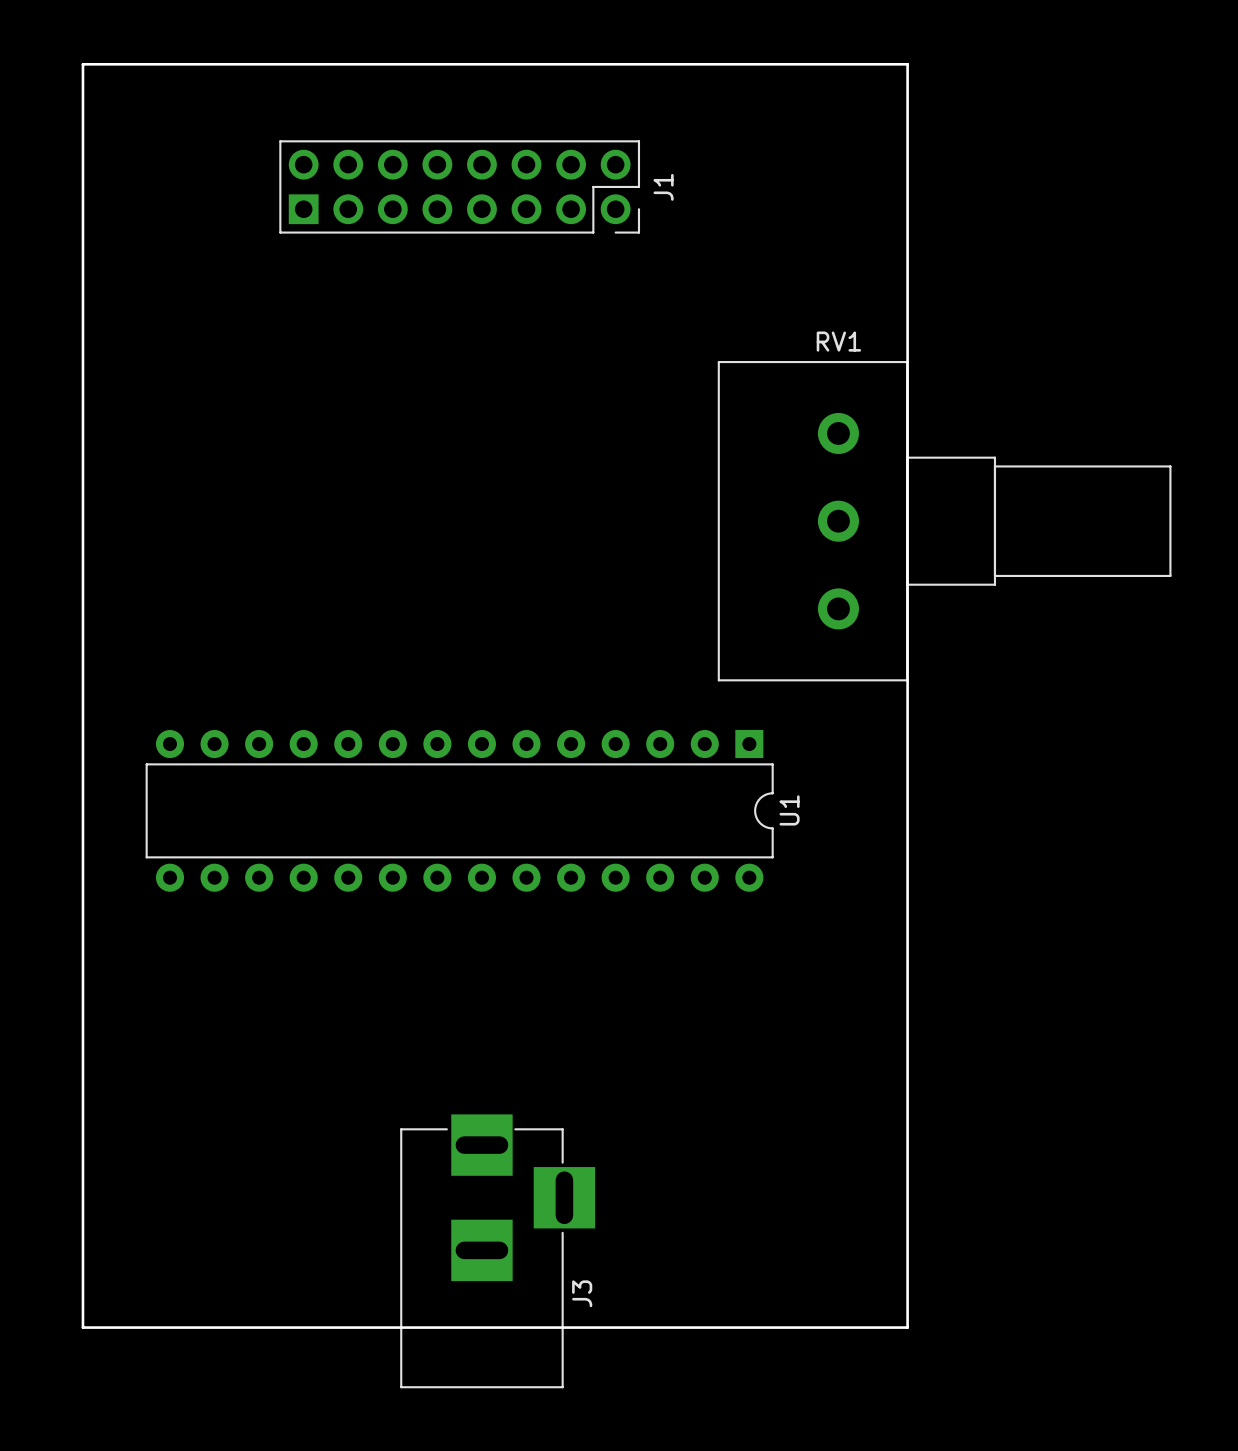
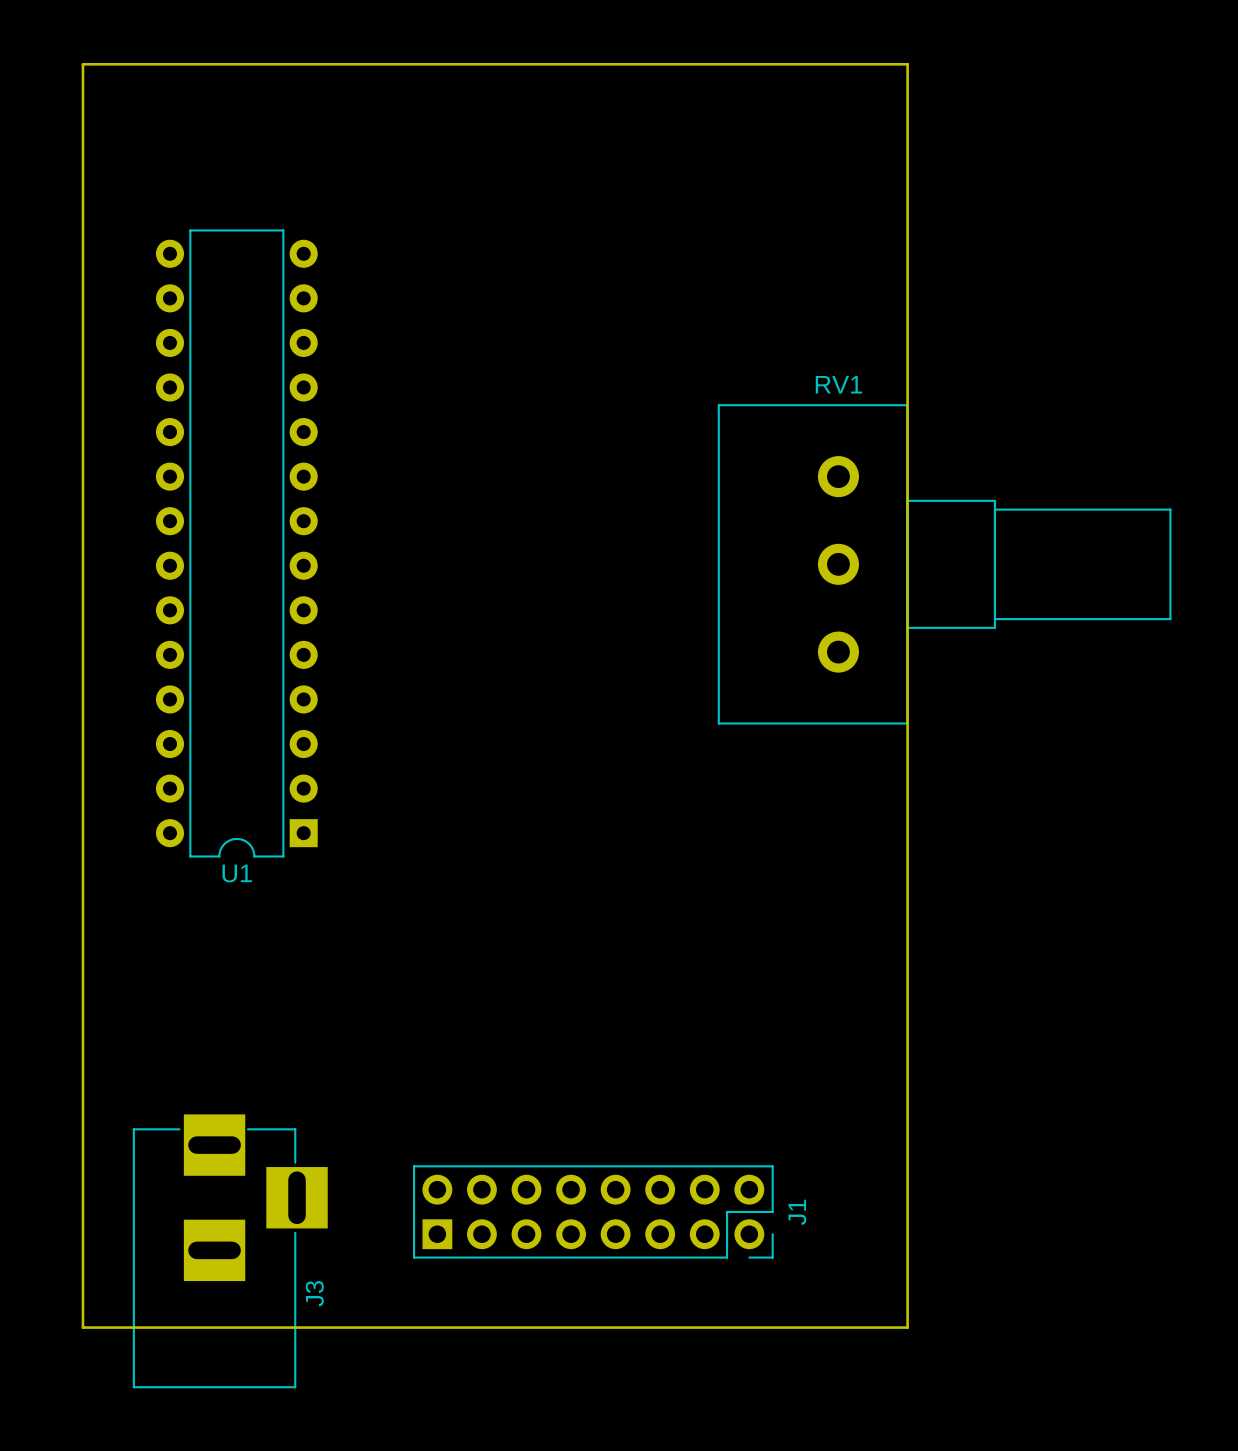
J1 position: (459, 186) -> (593, 1211)
RV1 position: (944, 521) -> (944, 564)
U1 rotation: 0° (459, 810) -> 90° clockwise (236, 543)
J3 position: (497, 1251) -> (230, 1251)

